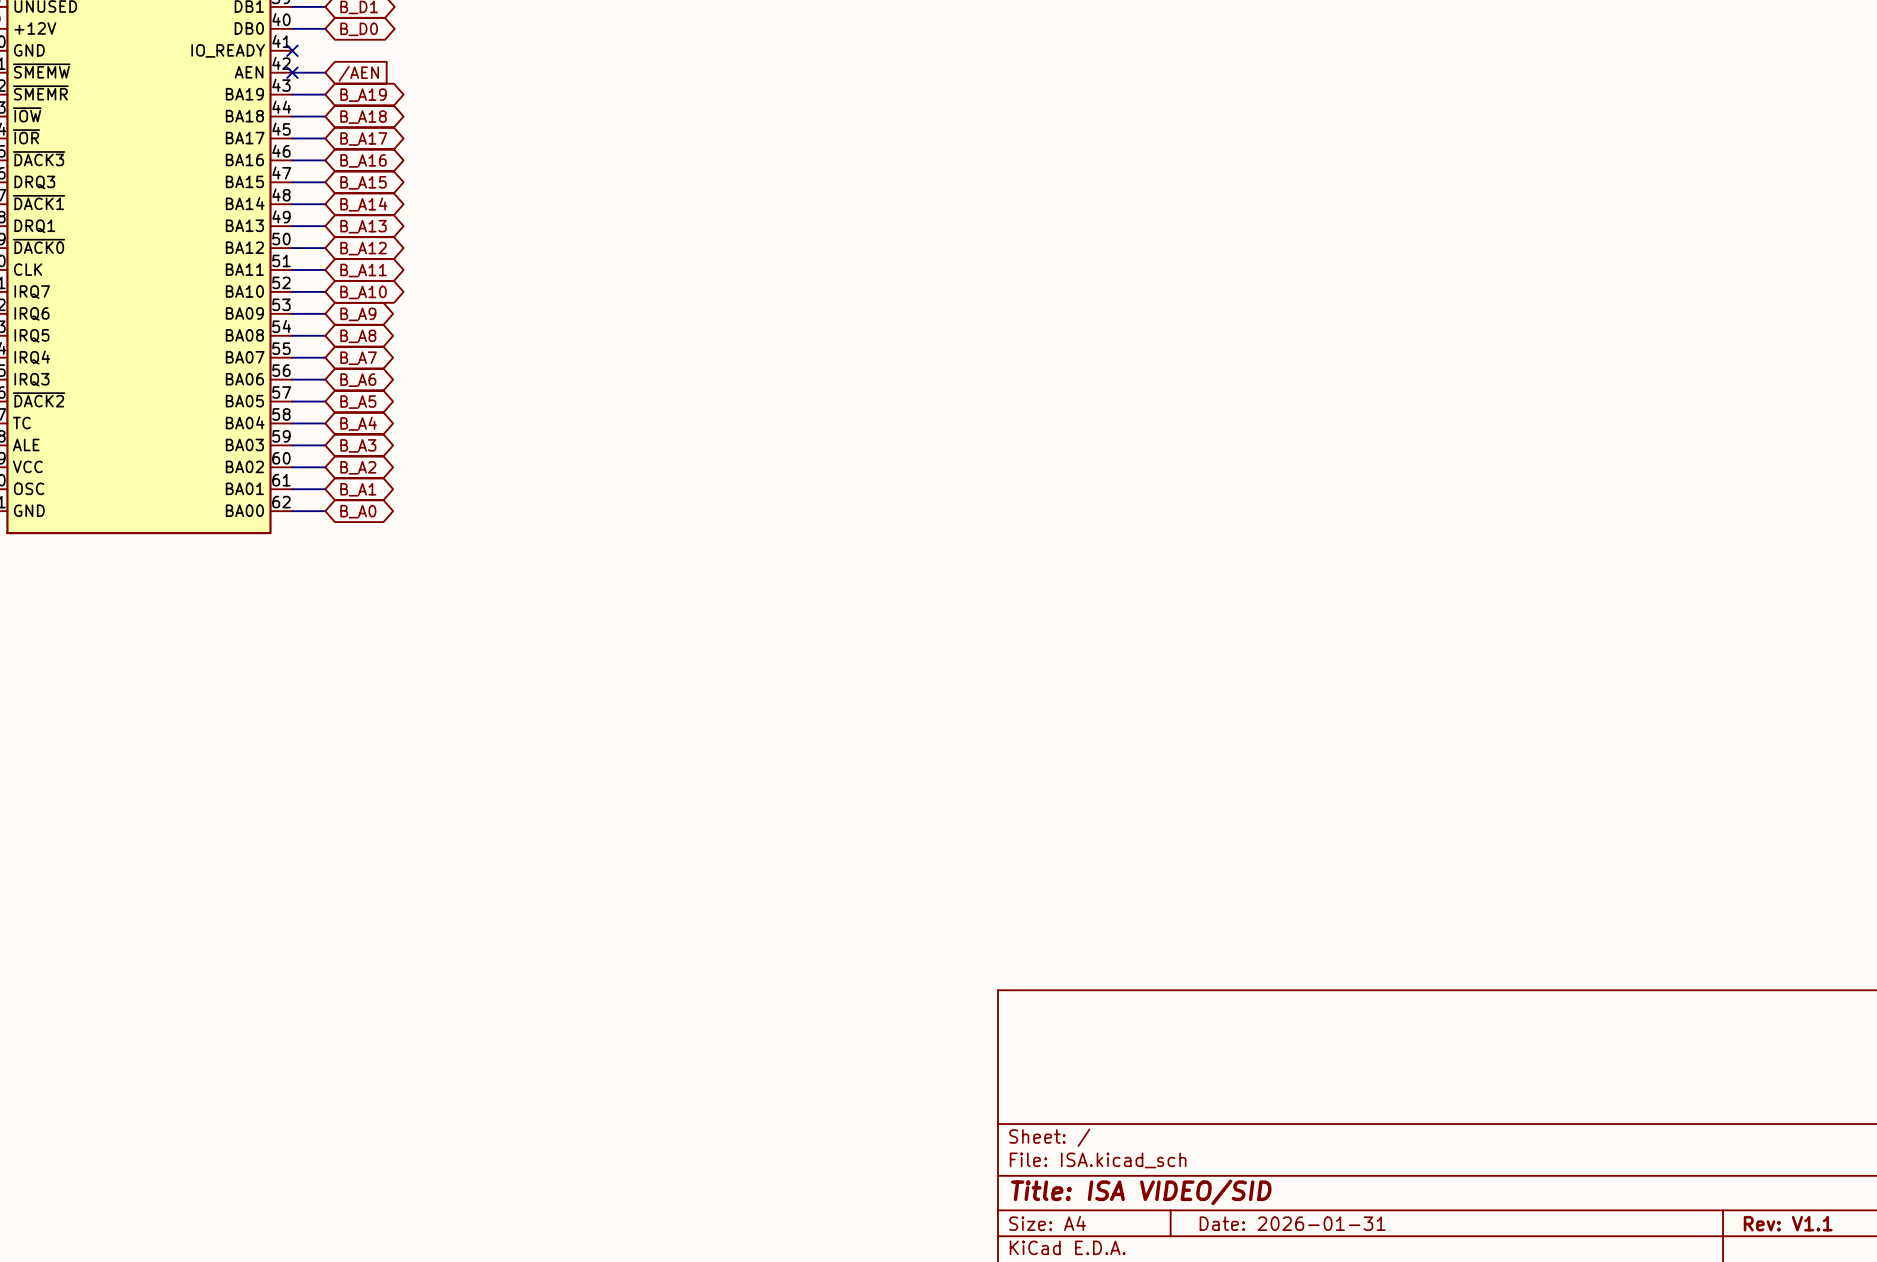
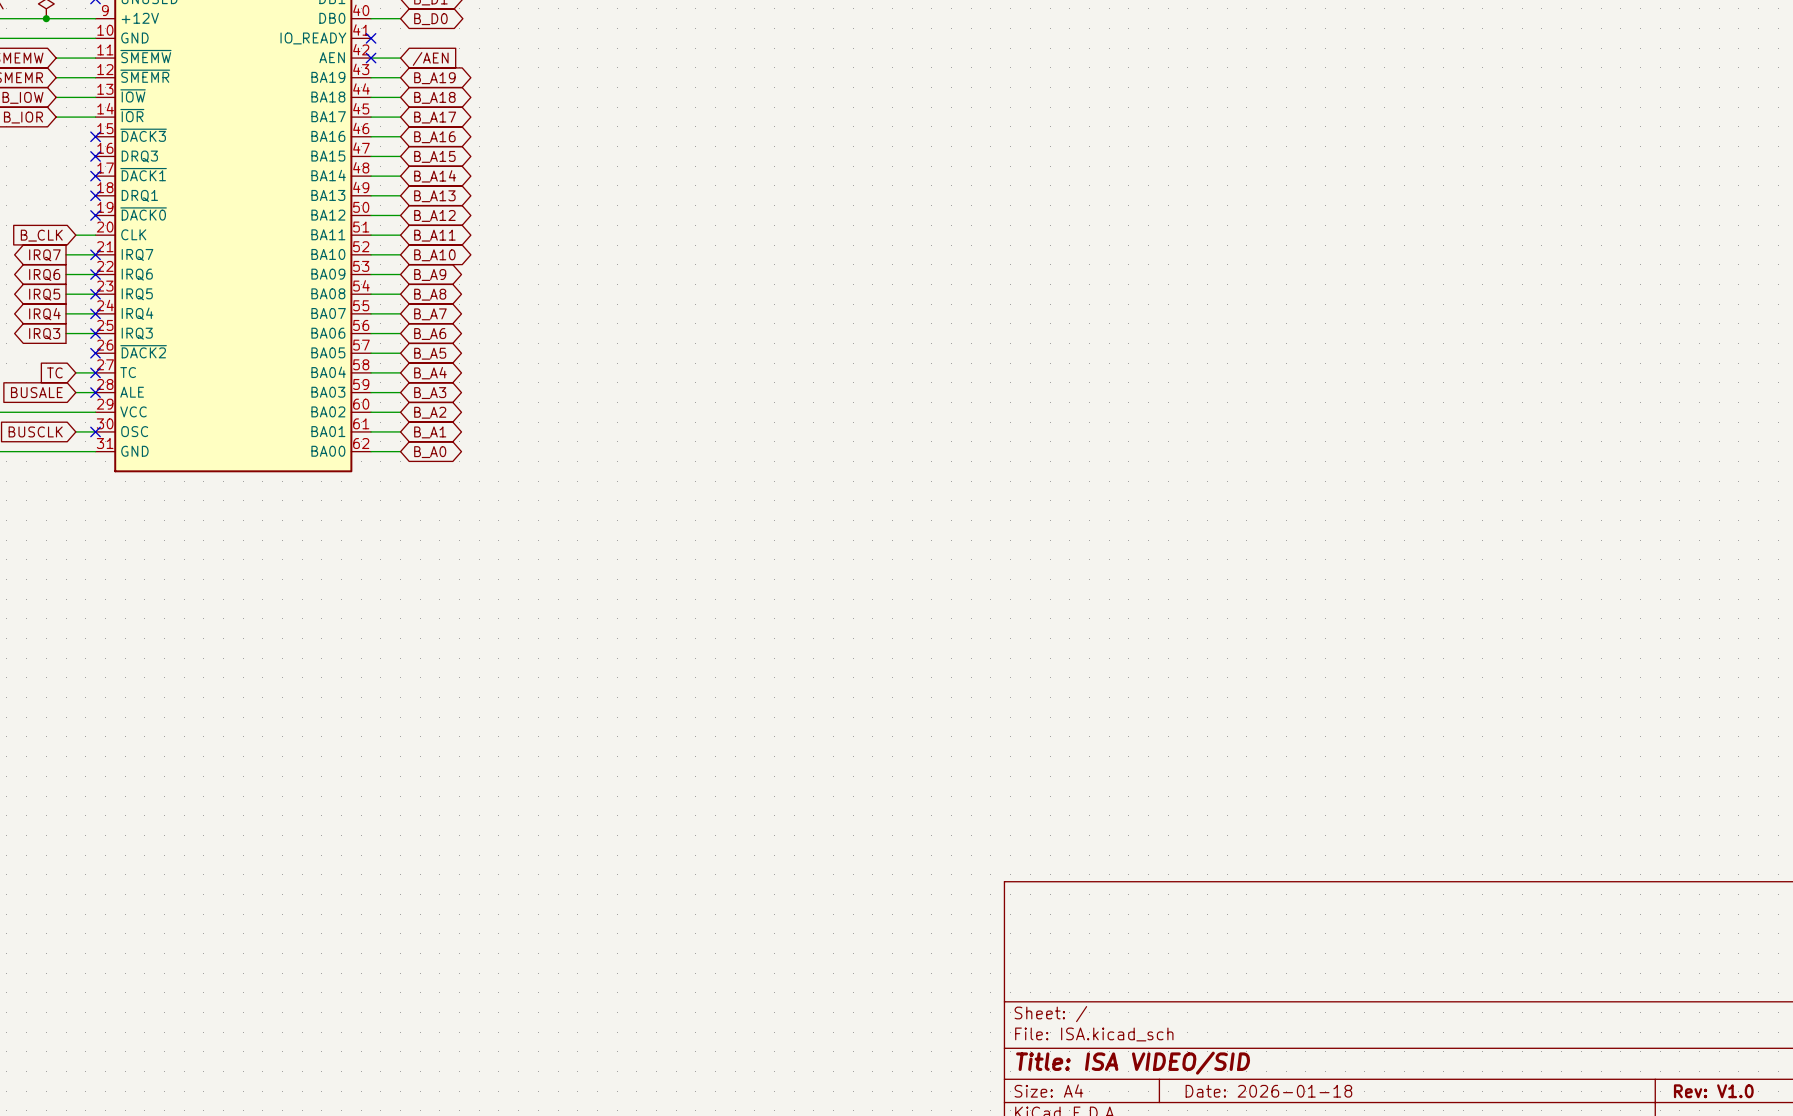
title block: Date: 2026-01-31 (1292, 1223) -> Date: 2026-01-18 (1268, 1091)
title block: Rev: V1.1 (1788, 1223) -> Rev: V1.0 (1713, 1091)

